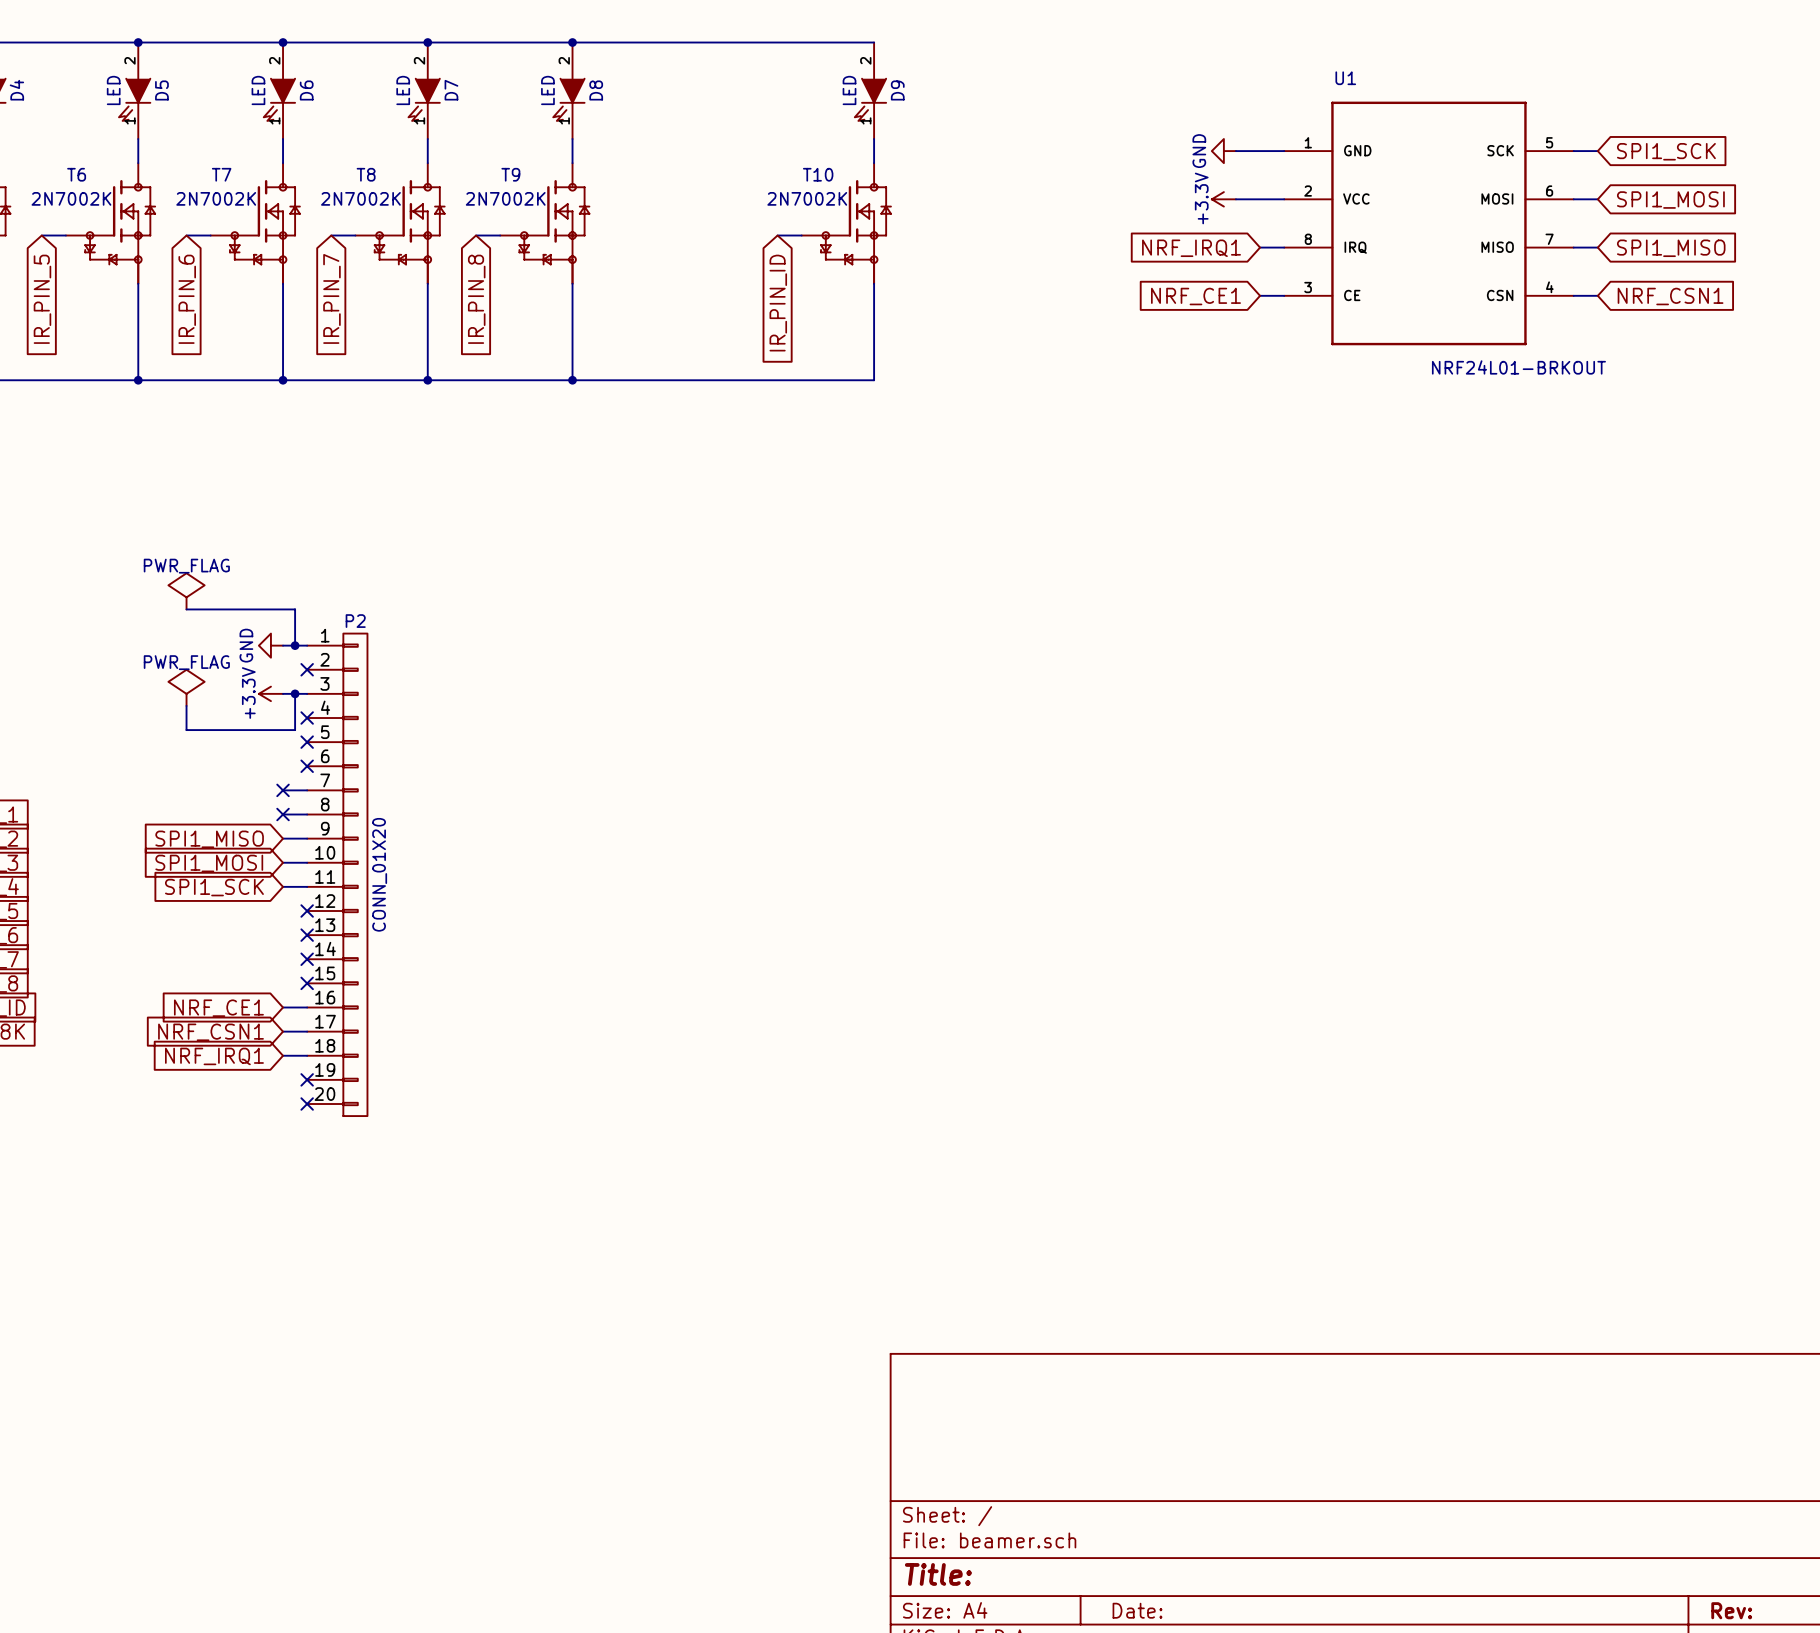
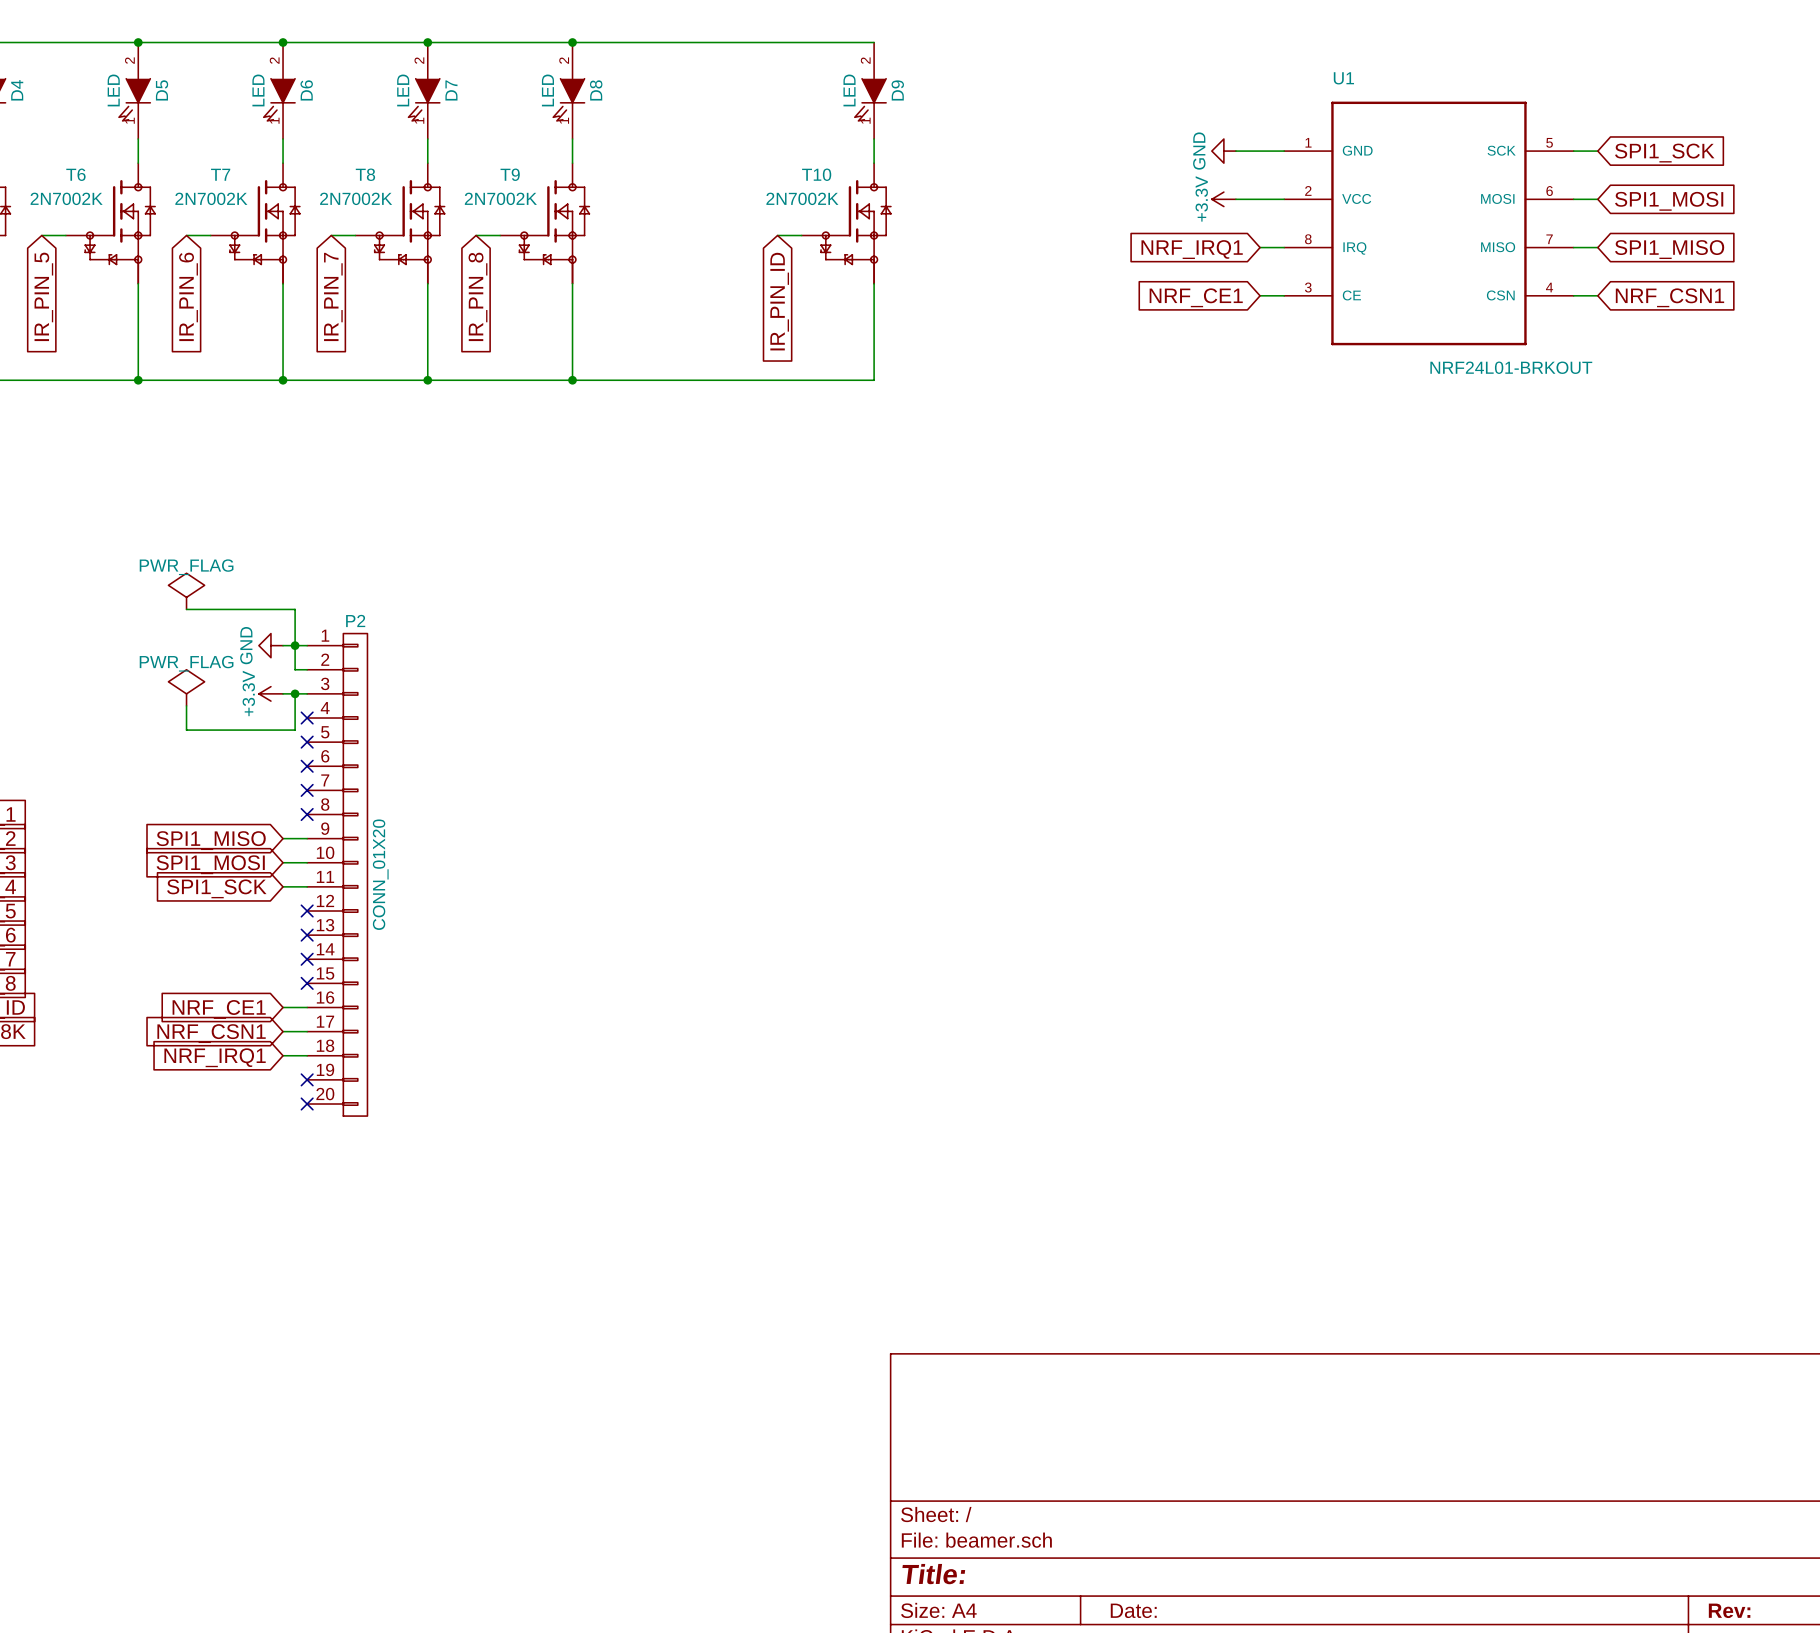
wire: none -> (295, 645) (295, 669) (307, 669)
no-connect mark: (307, 669) -> none
wire: (283, 790) (307, 790) -> none
no-connect mark: (283, 790) -> none
no-connect mark: none -> (307, 790)
wire: (283, 814) (307, 814) -> none
no-connect mark: (283, 814) -> none
no-connect mark: none -> (307, 814)

